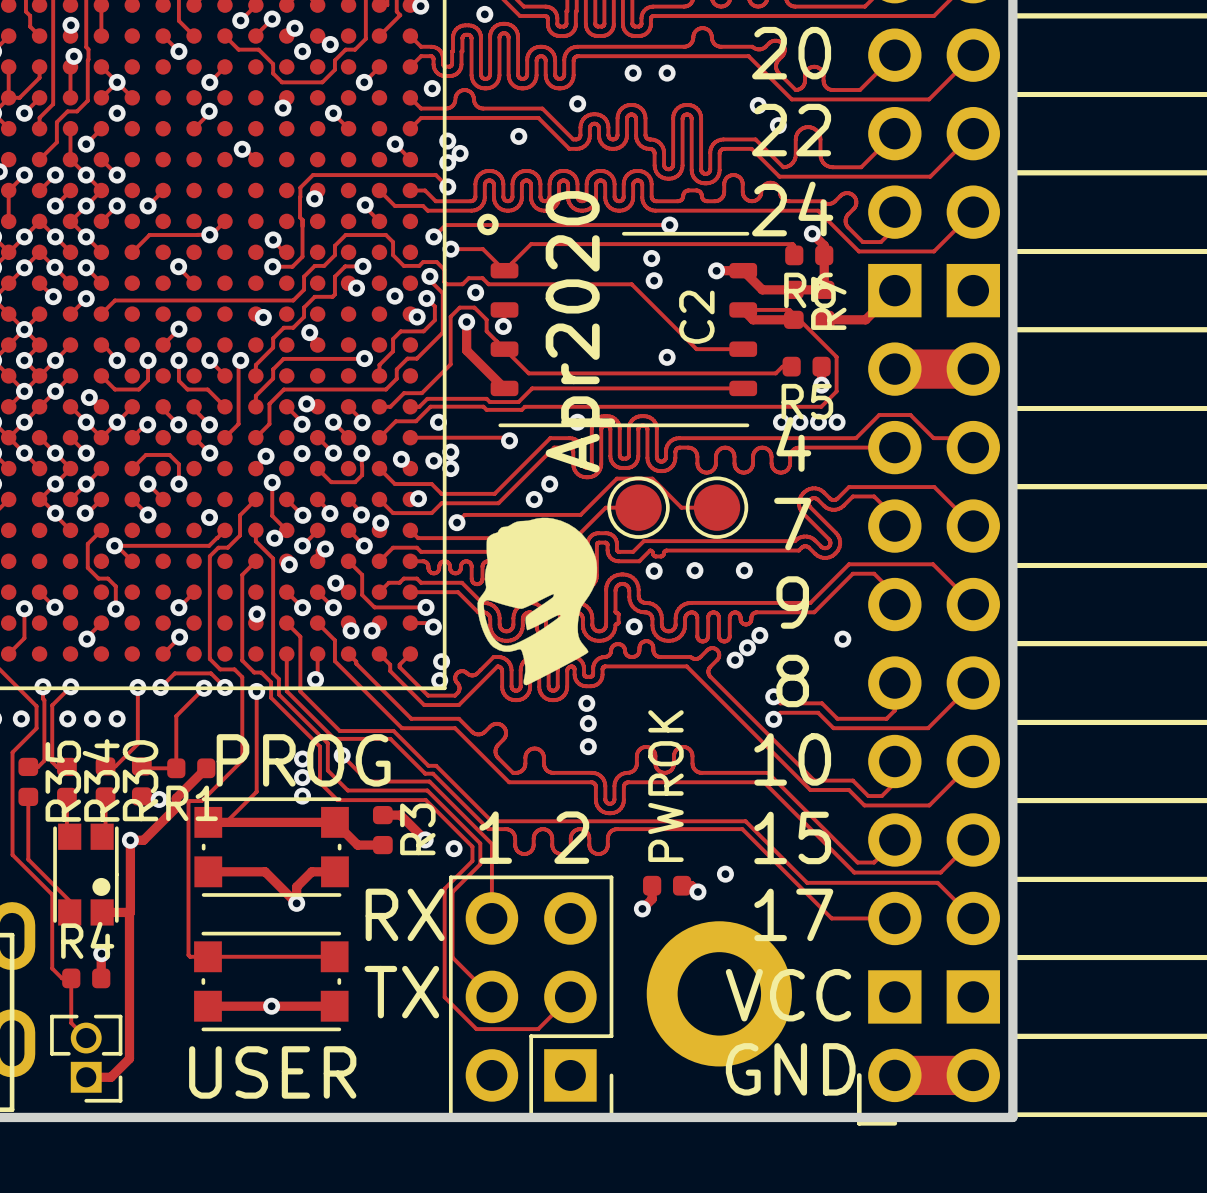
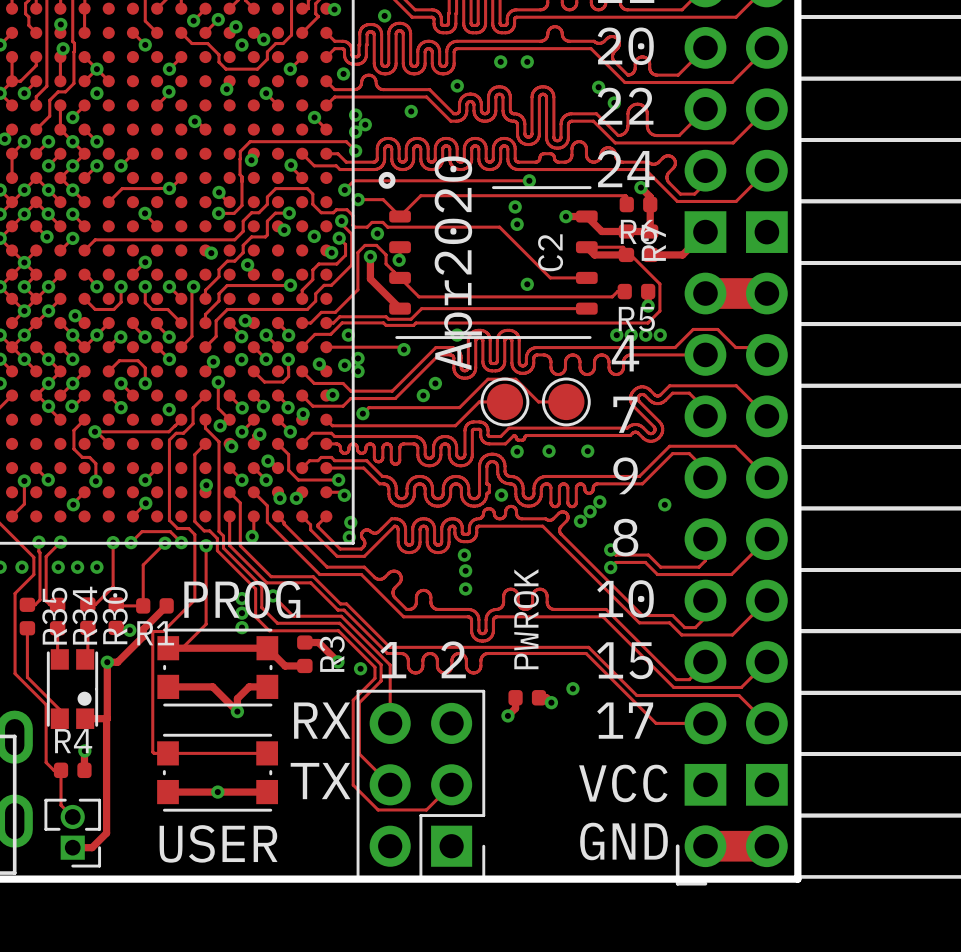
drawing: [477, 517, 598, 686] -> none
part: (719, 993) -> none

